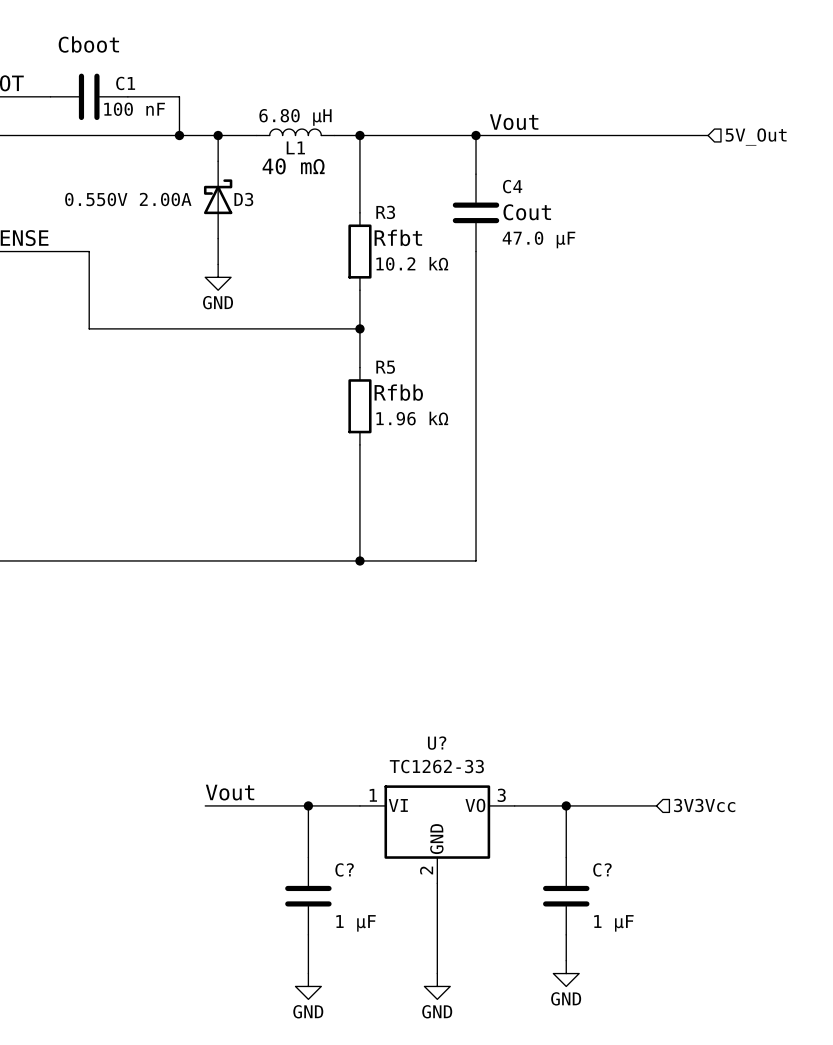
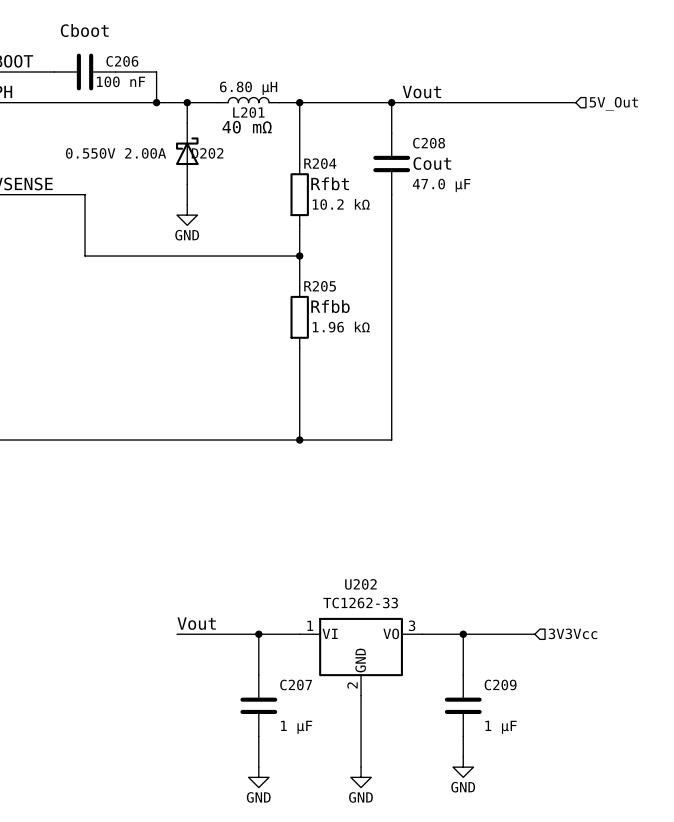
C1 name: C1 (125, 83) -> C206 (122, 61)
L1 name: L1 (295, 147) -> L201 (248, 112)
C4 name: C4 (512, 186) -> C208 (429, 143)
D3 name: D3 (243, 199) -> D202 (207, 153)
R3 name: R3 (385, 212) -> R204 (320, 163)
R5 name: R5 (385, 367) -> R205 (320, 286)
U? name: U? (437, 743) -> U202 (360, 584)
C? name: C? (344, 869) -> C207 (296, 684)
C? name: C? (602, 869) -> C209 (500, 684)

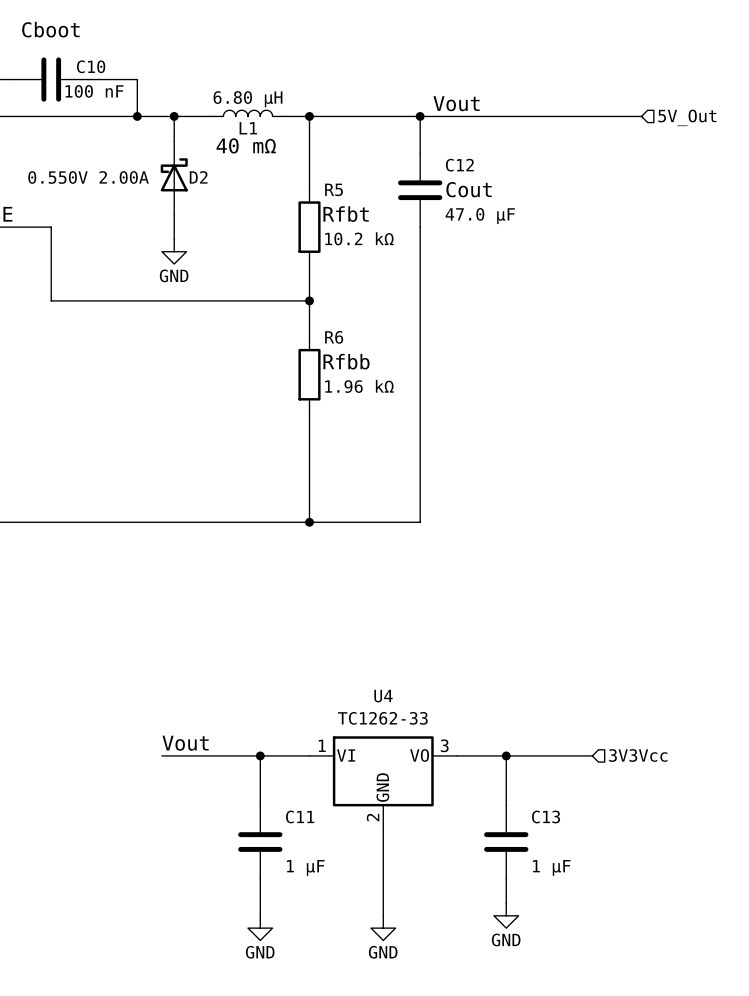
C206 name: C206 (122, 61) -> C10 (91, 66)
L201 name: L201 (248, 112) -> L1 (248, 128)
C208 name: C208 (429, 143) -> C12 (459, 165)
D202 name: D202 (207, 153) -> D2 (198, 177)
R204 name: R204 (320, 163) -> R5 (334, 189)
R205 name: R205 (320, 286) -> R6 (334, 337)
U202 name: U202 (360, 584) -> U4 (383, 696)
C207 name: C207 (296, 684) -> C11 (300, 816)
C209 name: C209 (500, 684) -> C13 (546, 816)

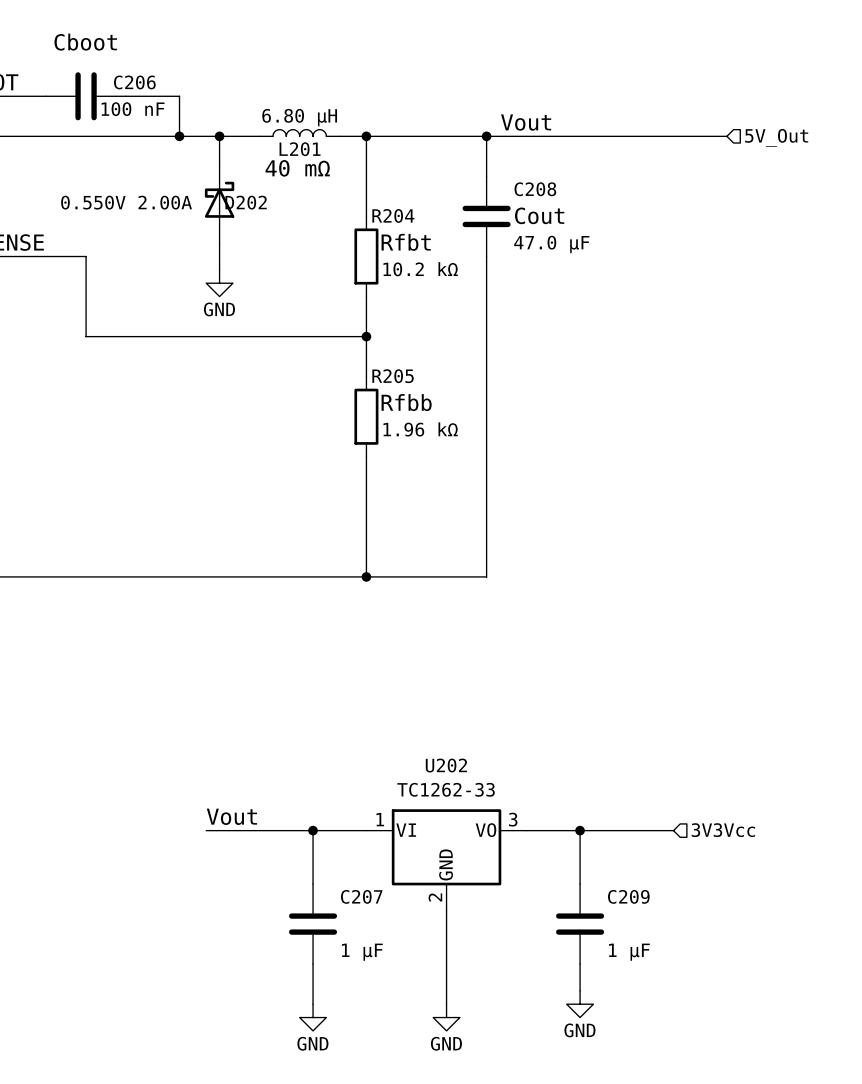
C10 name: C10 (91, 66) -> C206 (134, 82)
L1 name: L1 (248, 128) -> L201 (300, 149)
C12 name: C12 (459, 165) -> C208 (535, 189)
D2 name: D2 (198, 177) -> D202 (246, 202)
R5 name: R5 (334, 189) -> R204 (393, 215)
R6 name: R6 (334, 337) -> R205 (393, 376)
U4 name: U4 (383, 696) -> U202 (446, 765)
C11 name: C11 (300, 816) -> C207 (361, 896)
C13 name: C13 (546, 816) -> C209 (628, 896)

